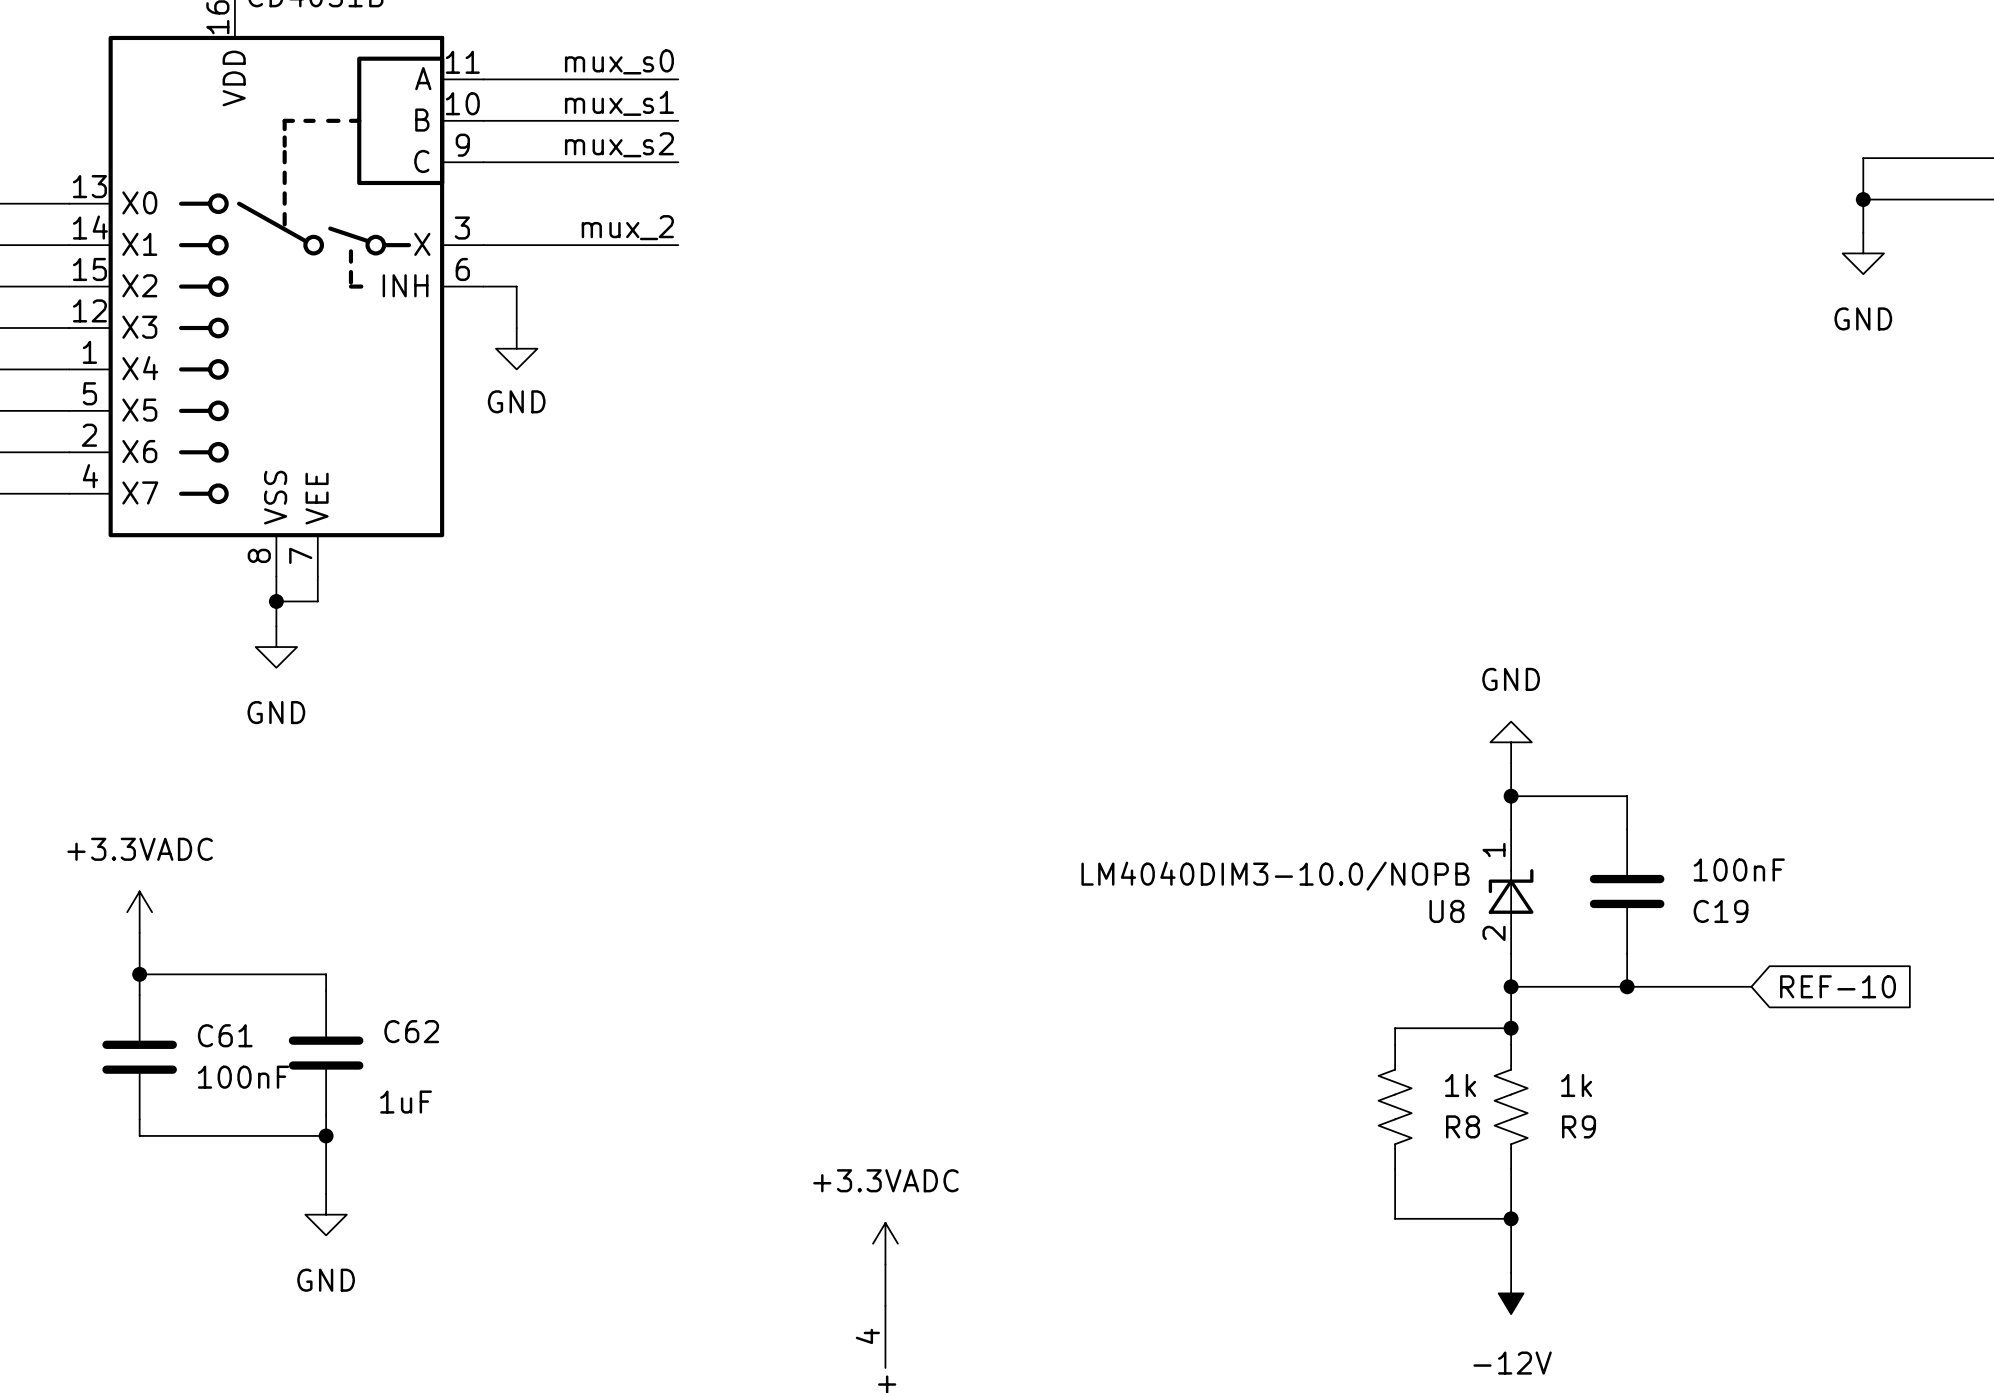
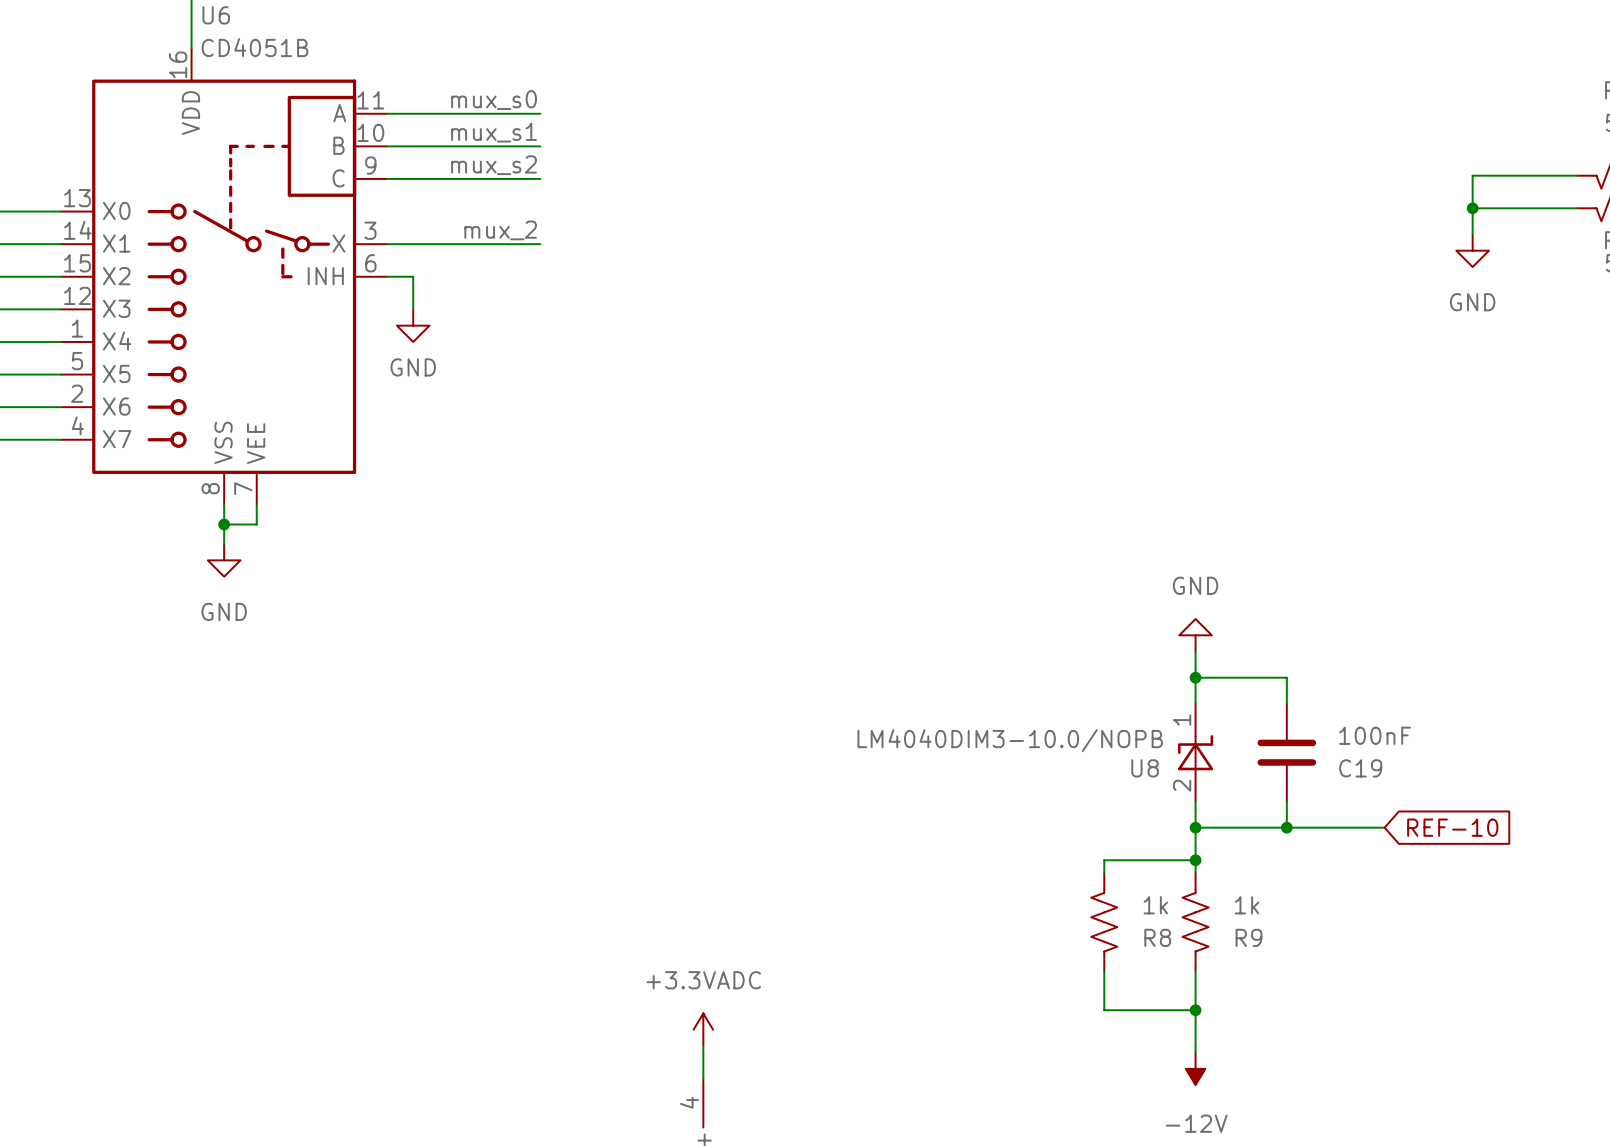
power symbol: +3.3VADC (139, 912) -> none
wire: (139, 932) (139, 995) -> none
wire: (139, 974) (326, 974) (326, 990) -> none
junction: (139, 974) -> none
C62: 1uF (326, 1053) -> none
C61: 100nF (139, 1057) -> none
wire: (326, 1115) (326, 1193) -> none
wire: (139, 1119) (139, 1135) (326, 1135) -> none
junction: (326, 1135) -> none
power symbol: GND (326, 1214) -> none

